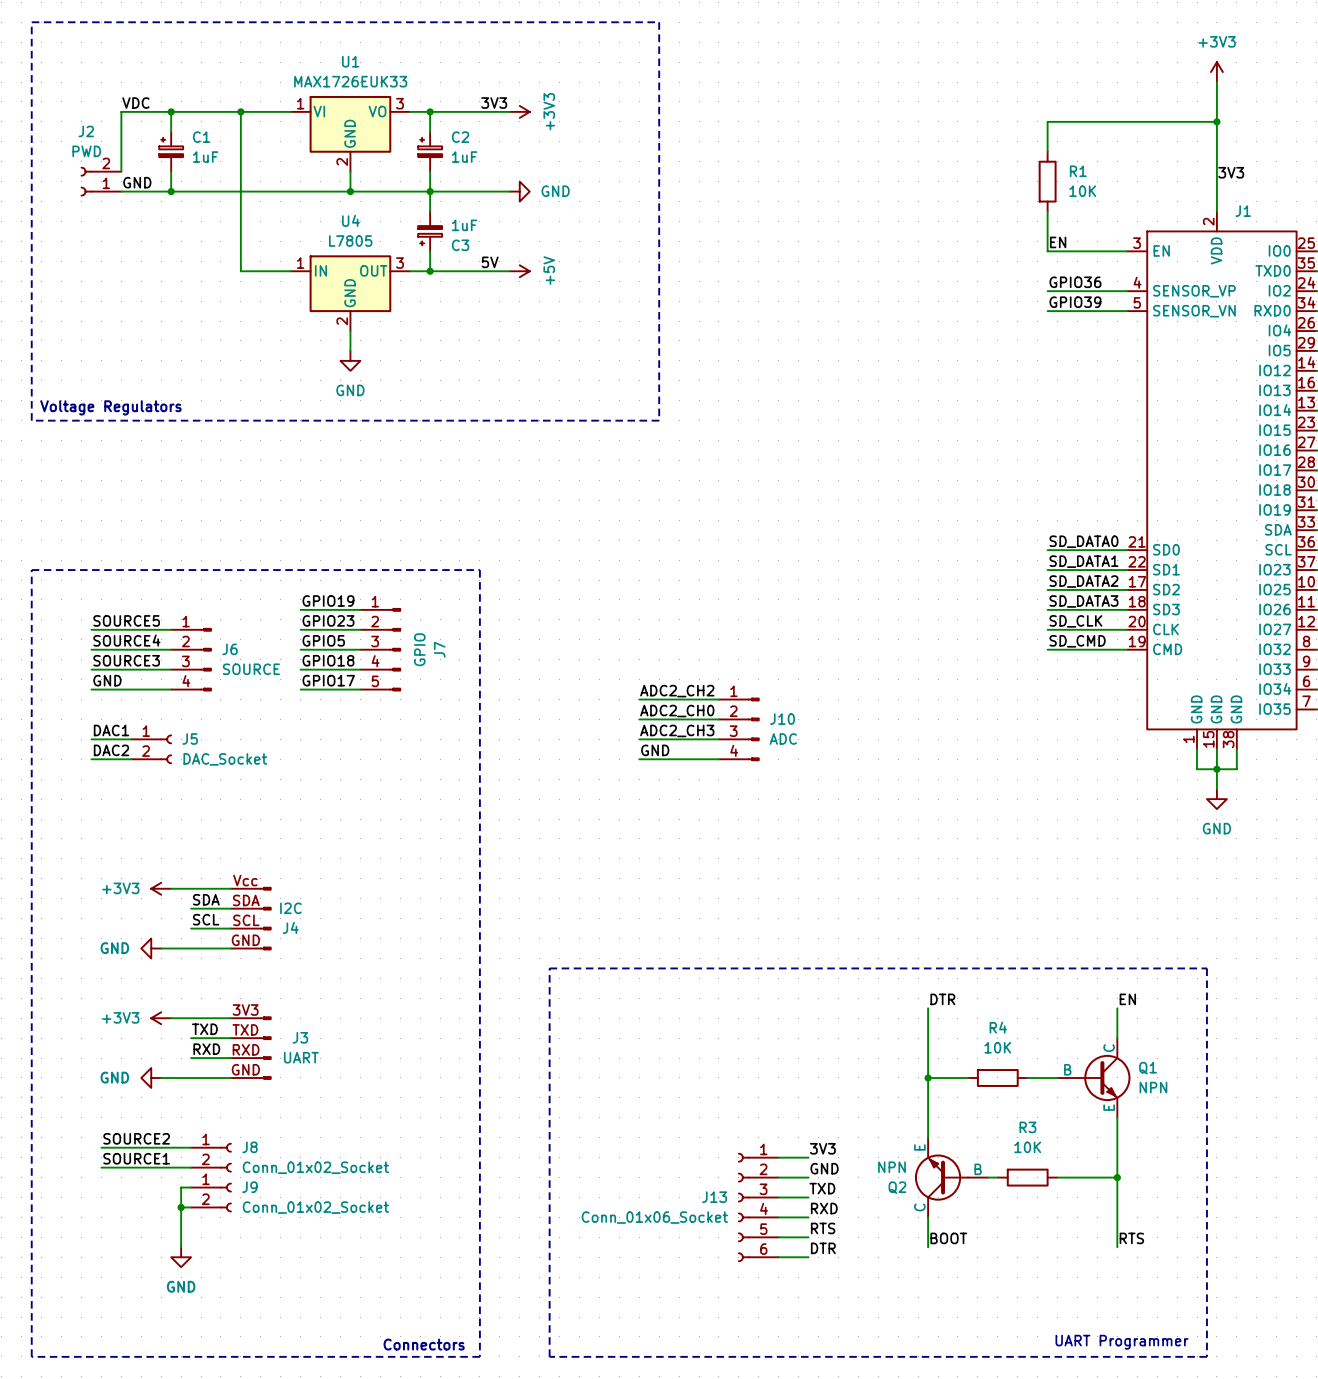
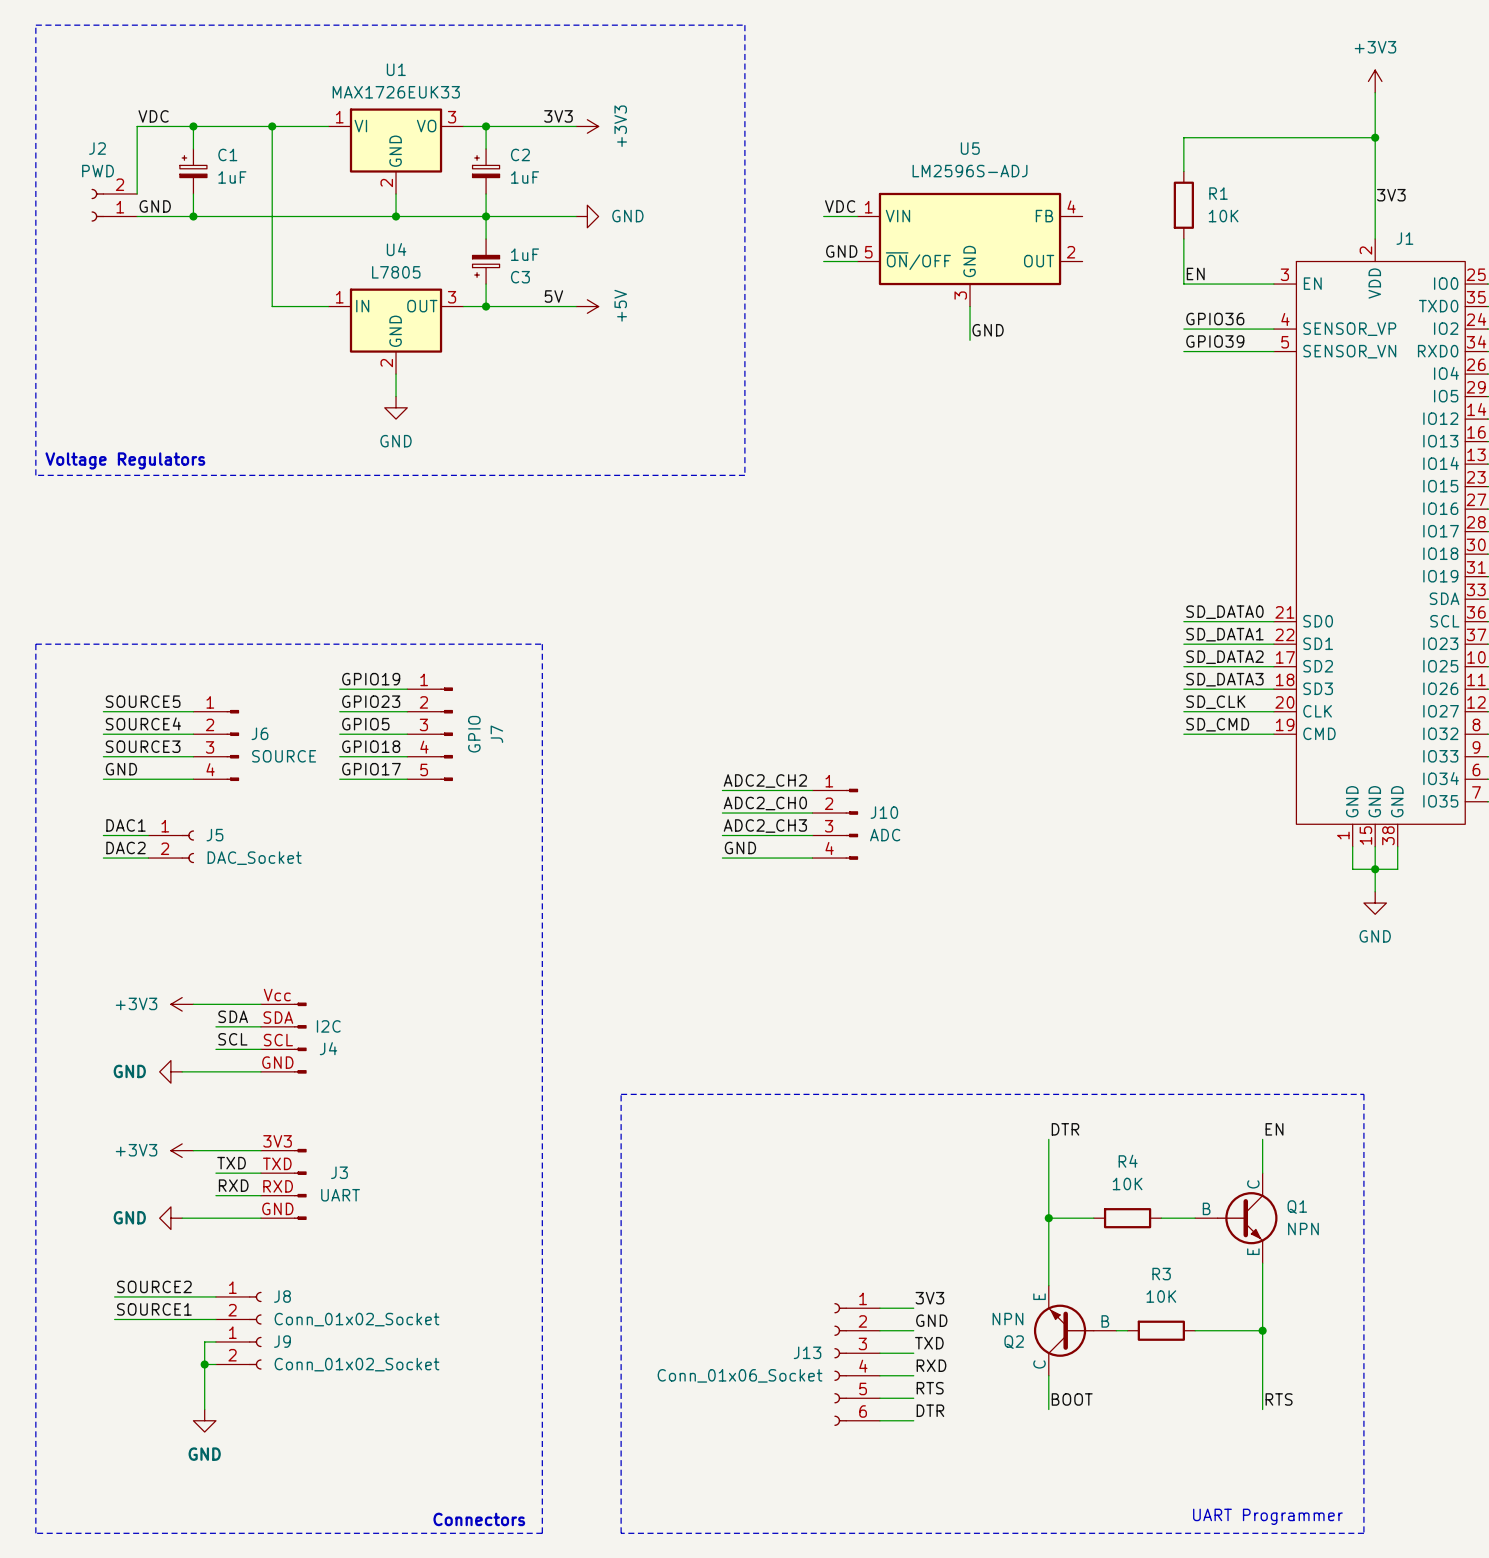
label: none -> VDC (840, 206)
wire: none -> (823, 216) (857, 216)
U5: none -> LM2596S-ADJ (970, 249)
label: none -> GND (841, 251)
wire: none -> (823, 261) (857, 261)
wire: none -> (970, 306) (970, 340)
label: none -> GND (988, 330)

